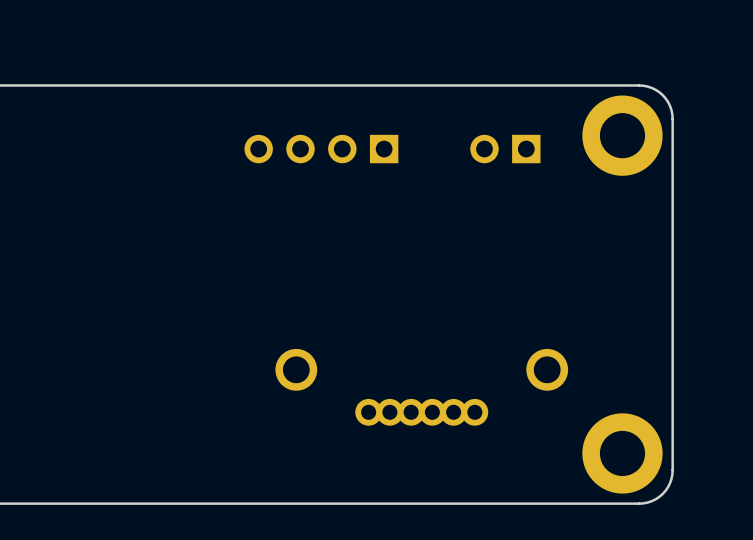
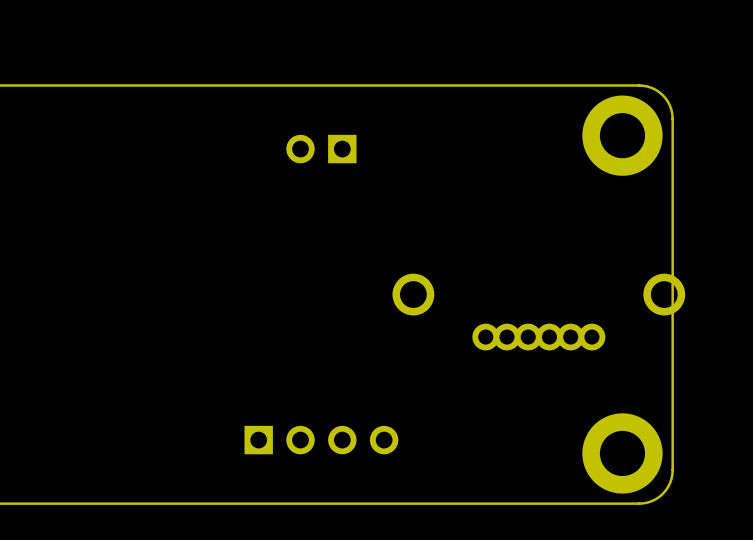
part footprint: [244, 134, 399, 164] -> [286, 134, 357, 164]
part: (505, 149) -> none
part position: (421, 387) -> (538, 312)
part: none -> (321, 440)

